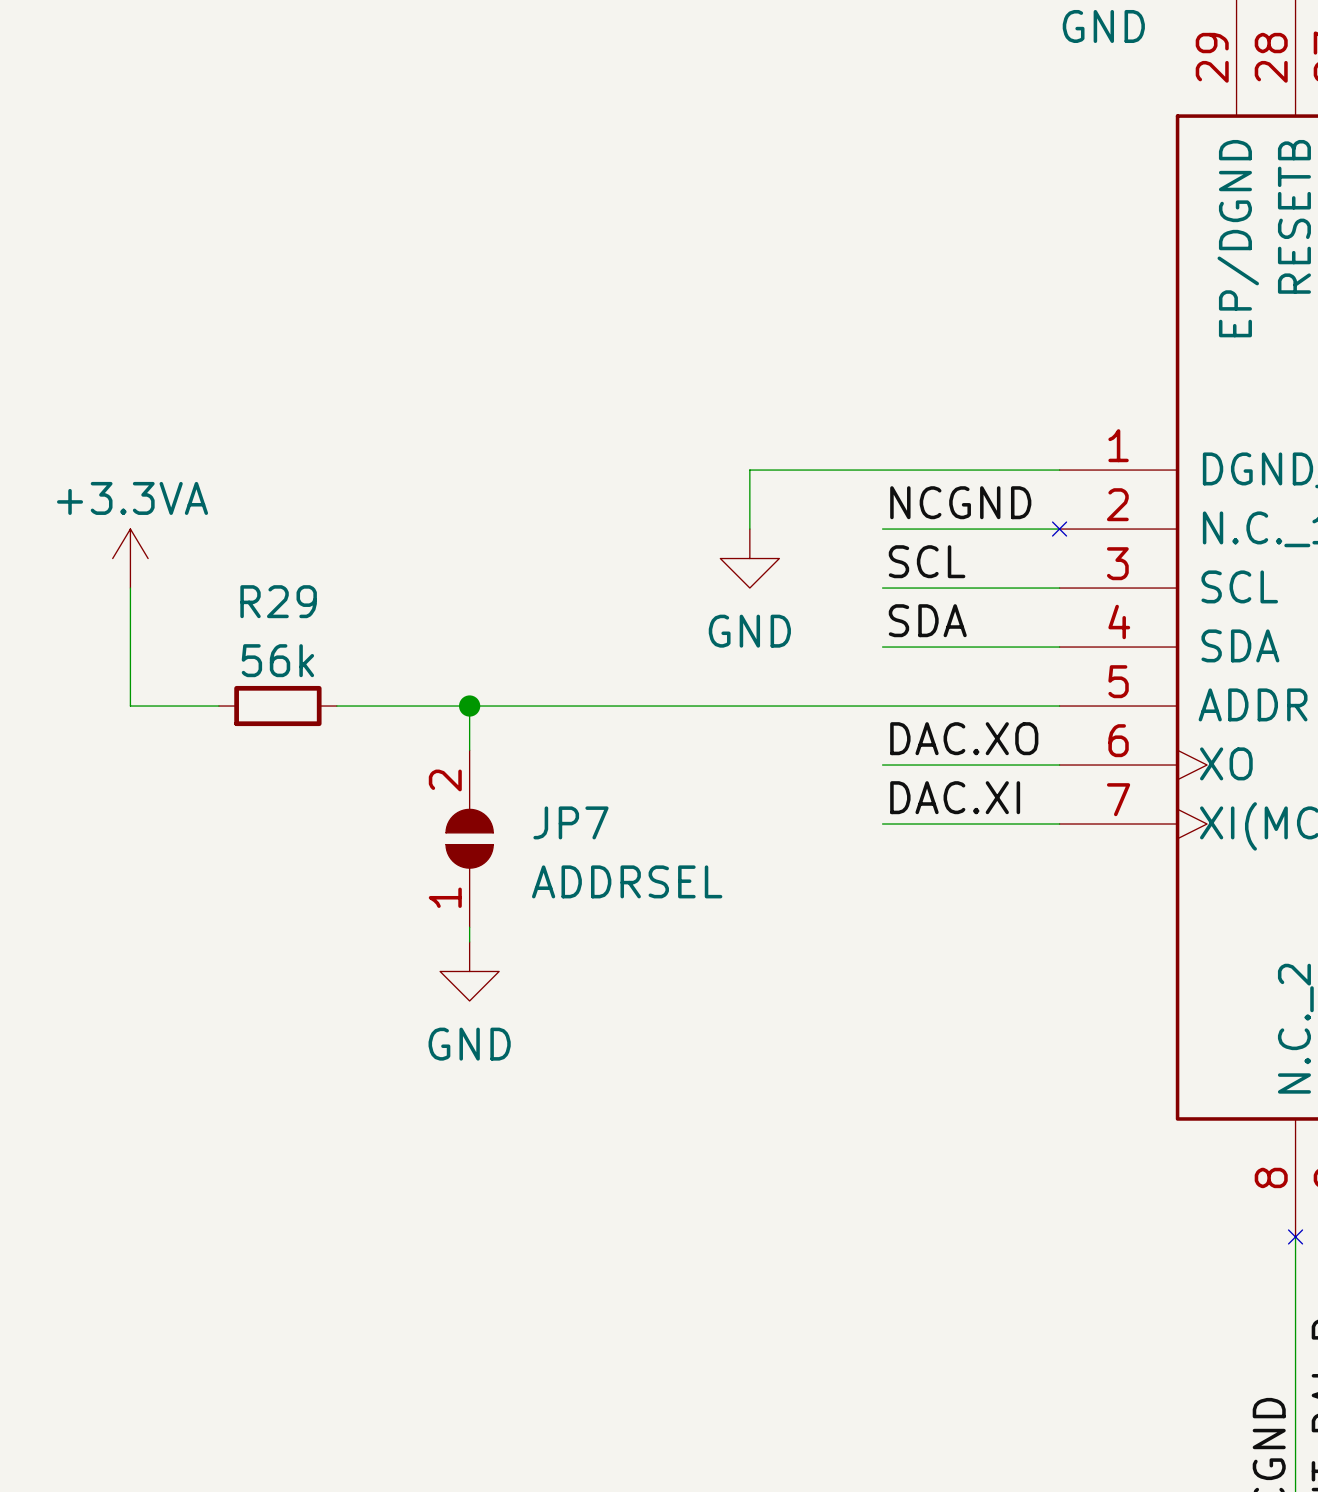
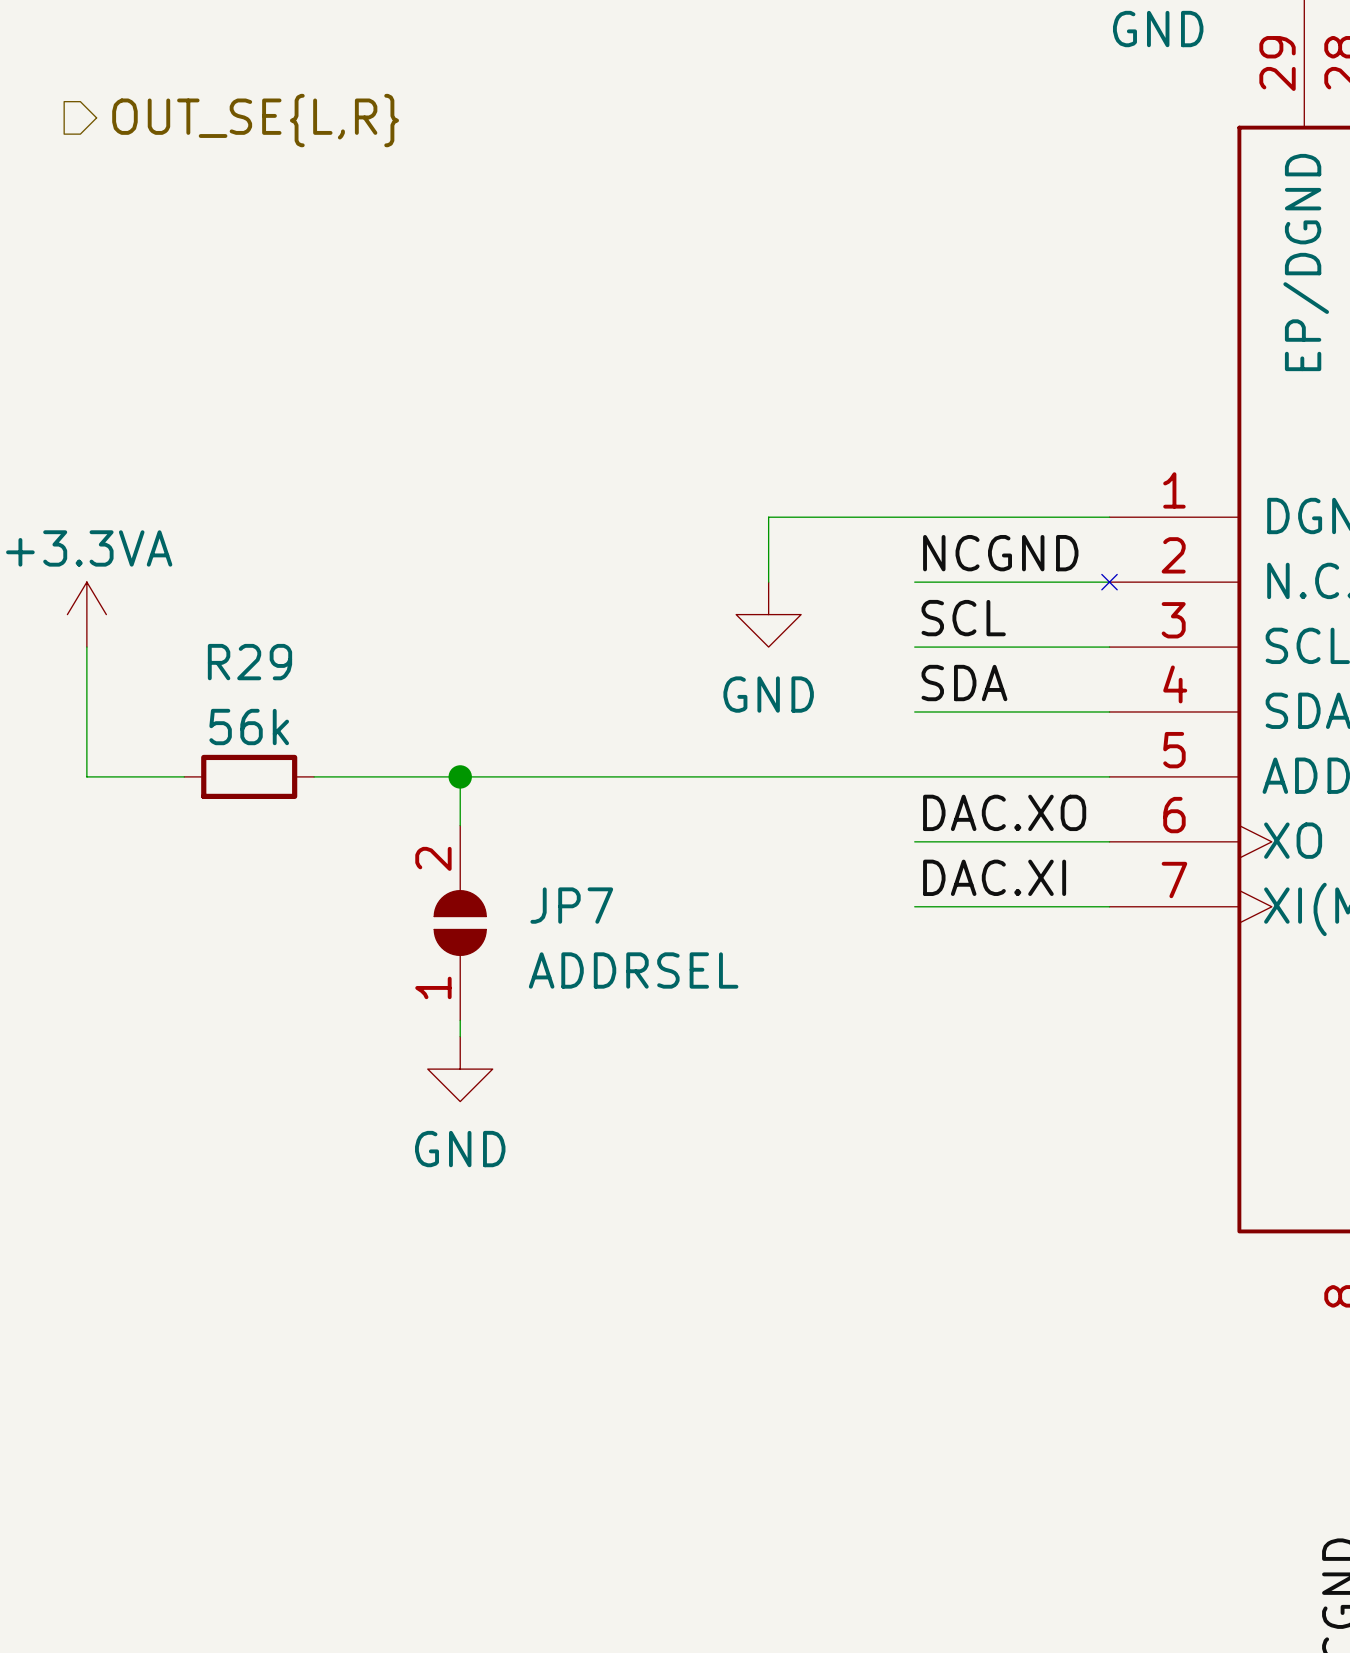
hierarchical label: none -> OUT_SE{L,R} (255, 120)

